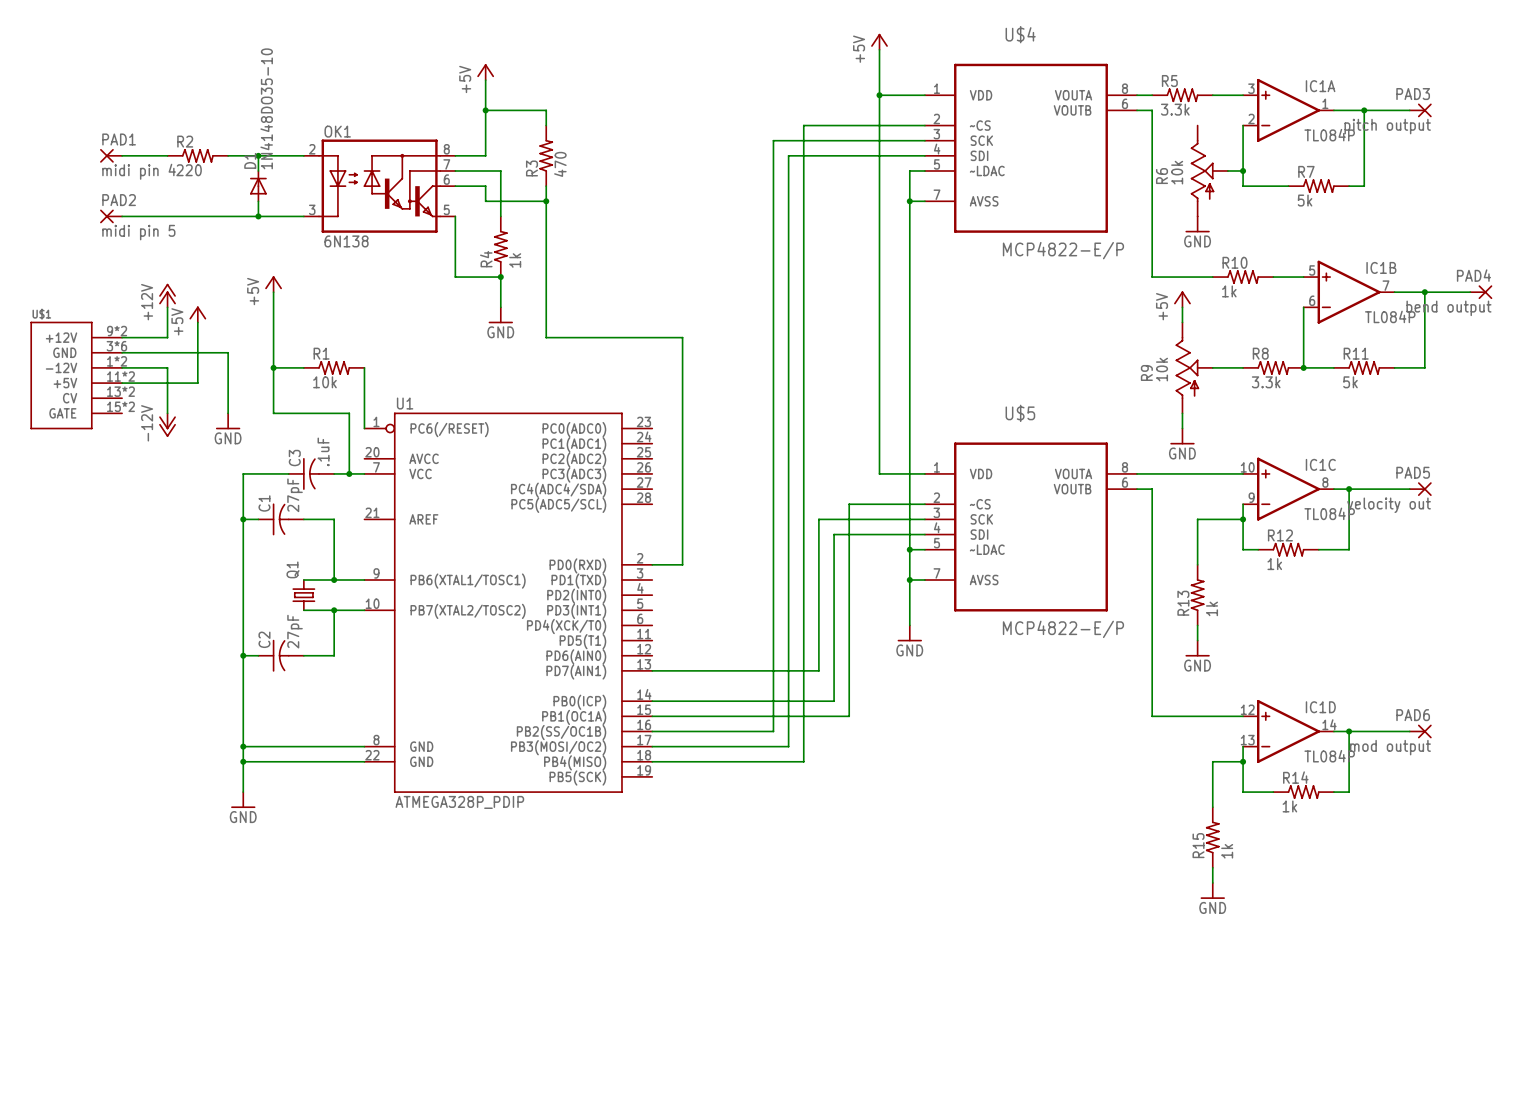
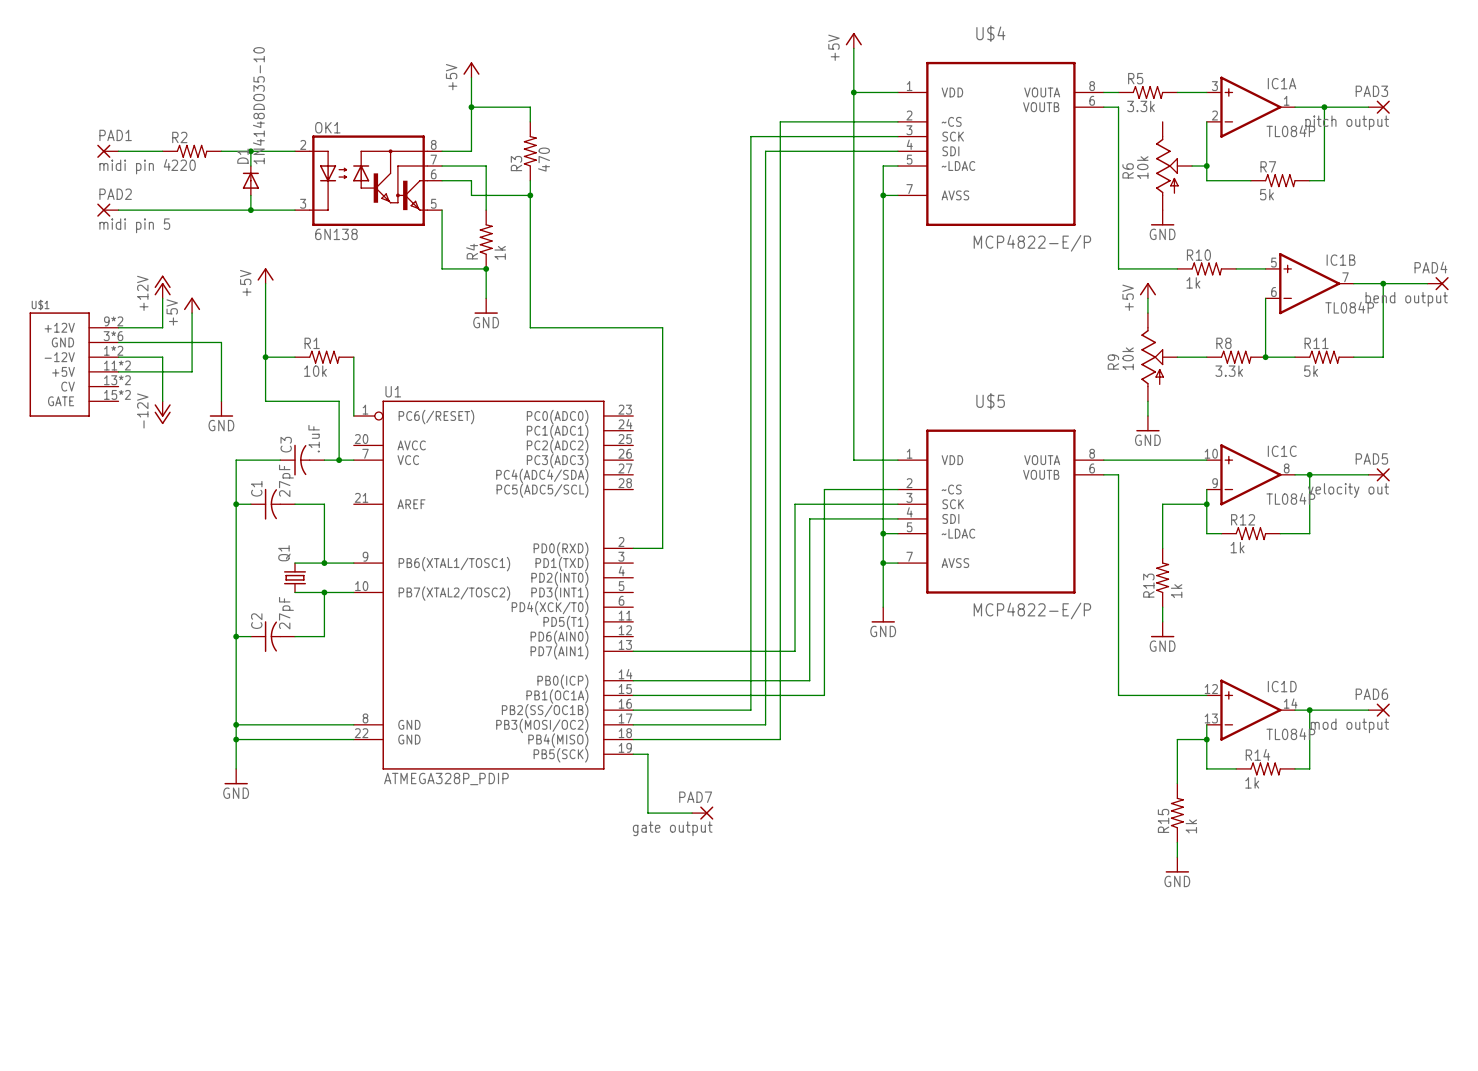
wire: none -> (633, 754) (647, 754) (647, 813) (692, 813)
PAD7: none -> gate output (702, 813)

